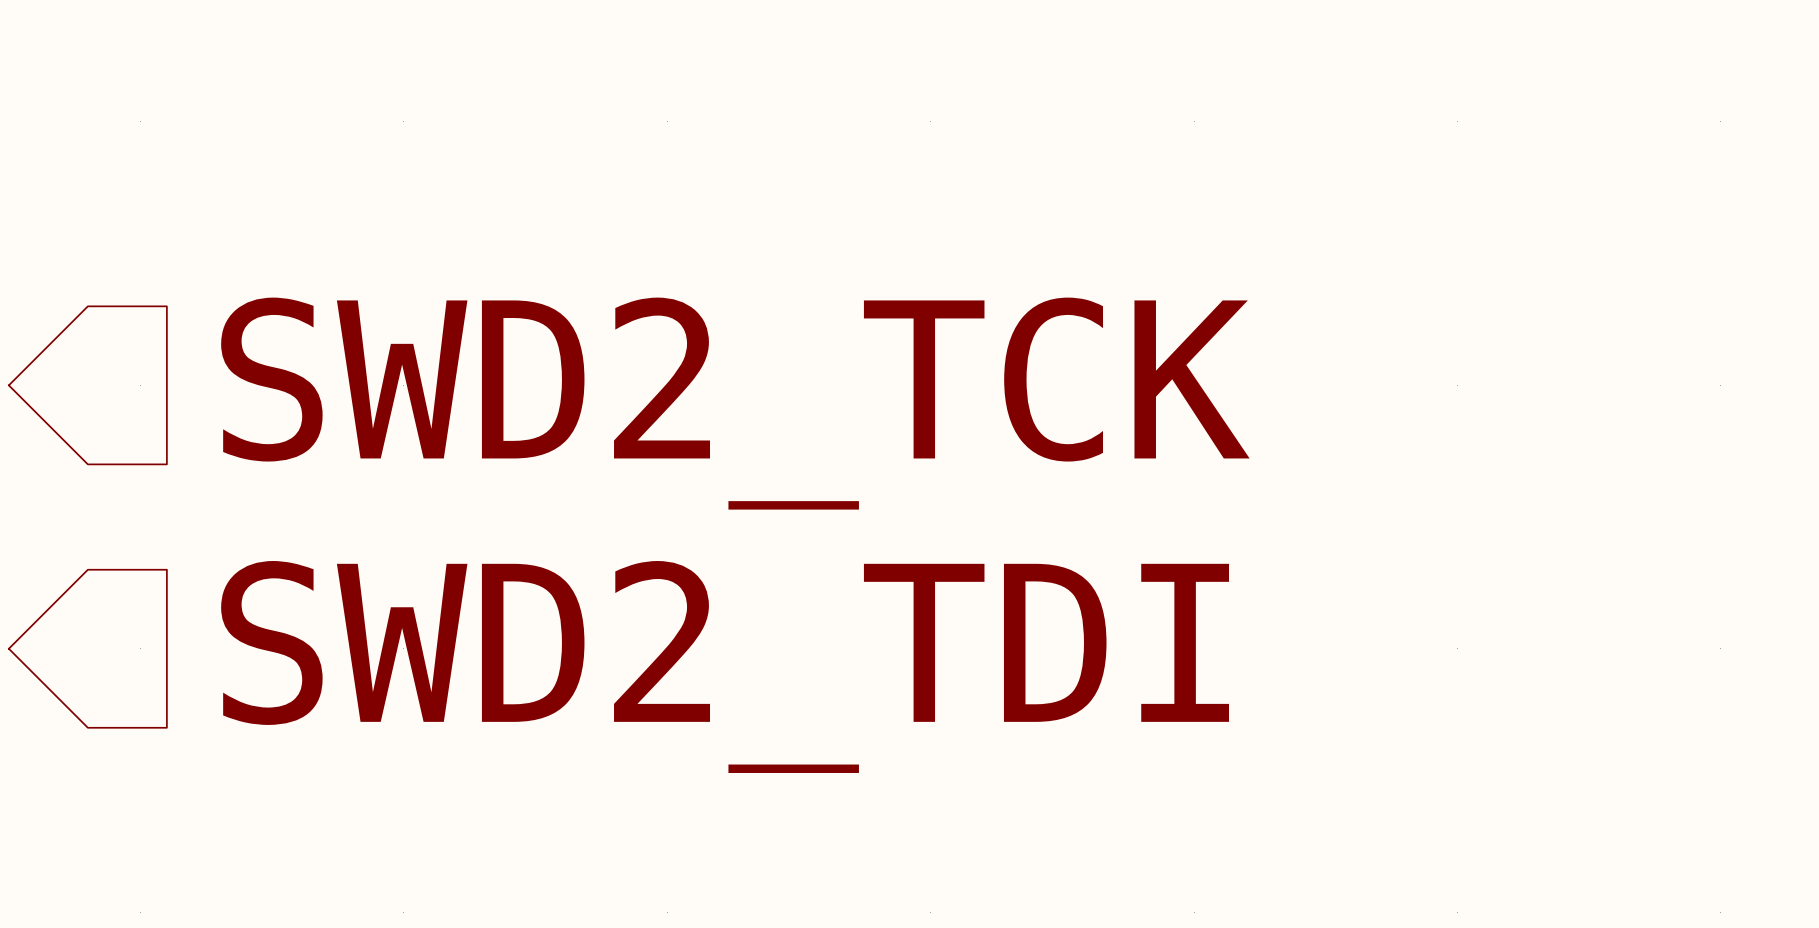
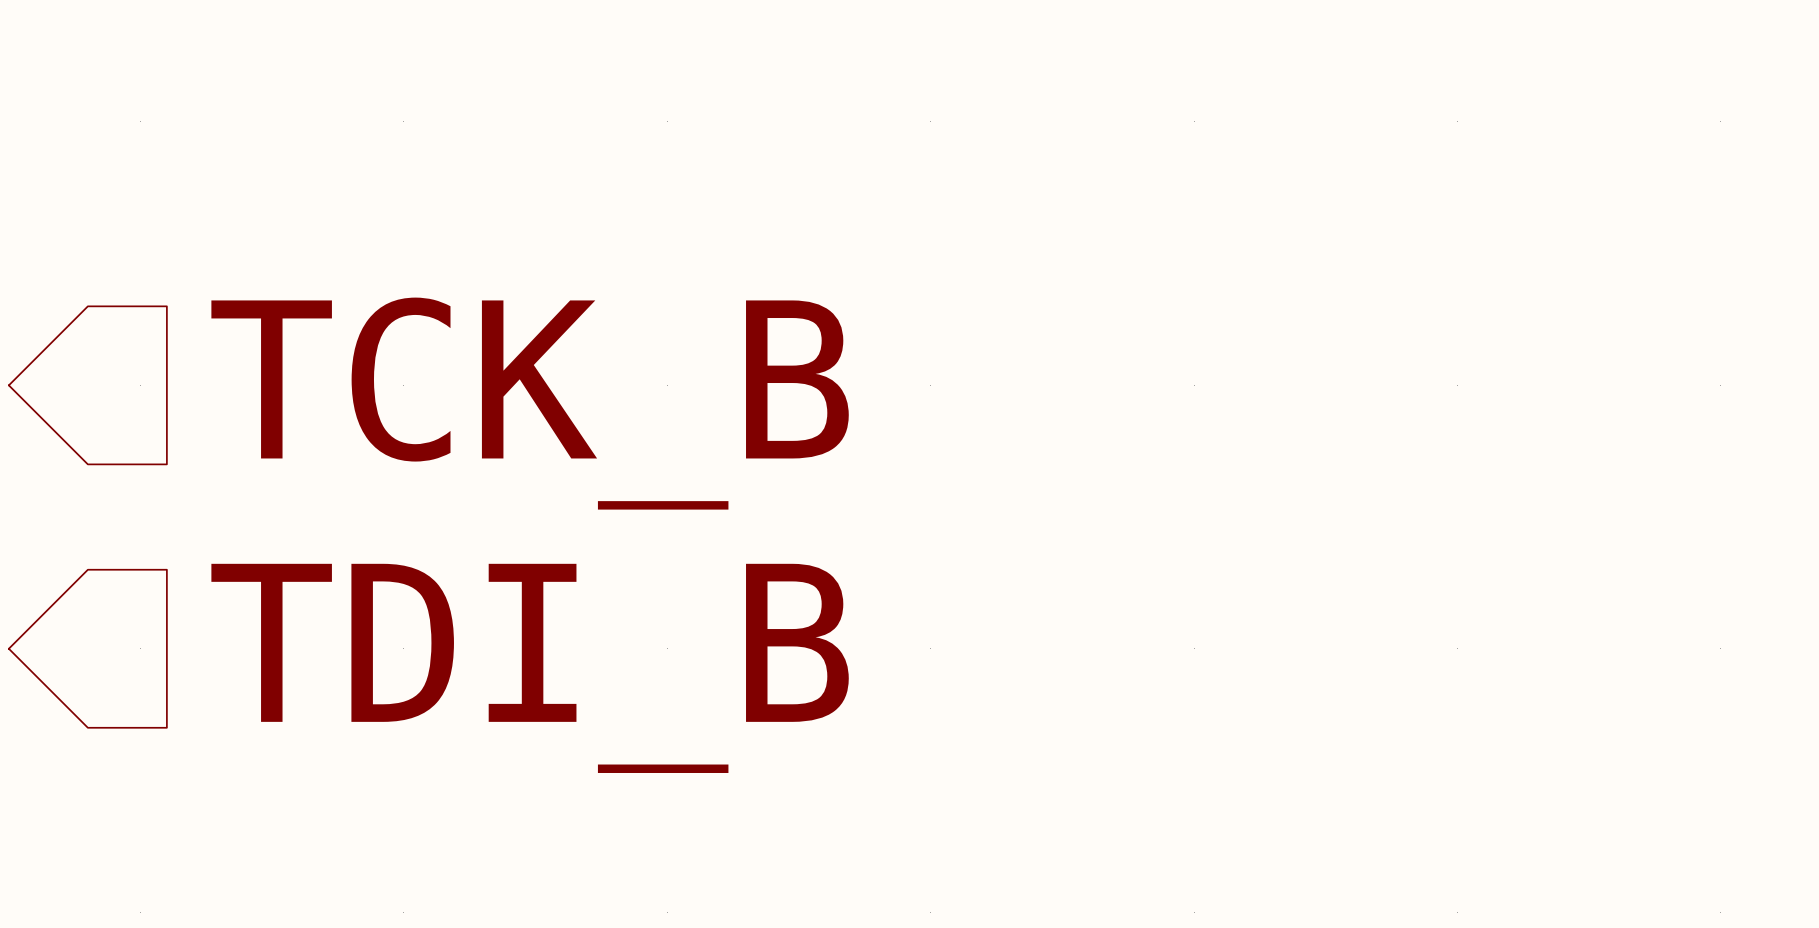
hierarchical label: SWD2_TCK (735, 403) -> TCK_B (530, 403)
hierarchical label: SWD2_TDI (725, 666) -> TDI_B (530, 668)

